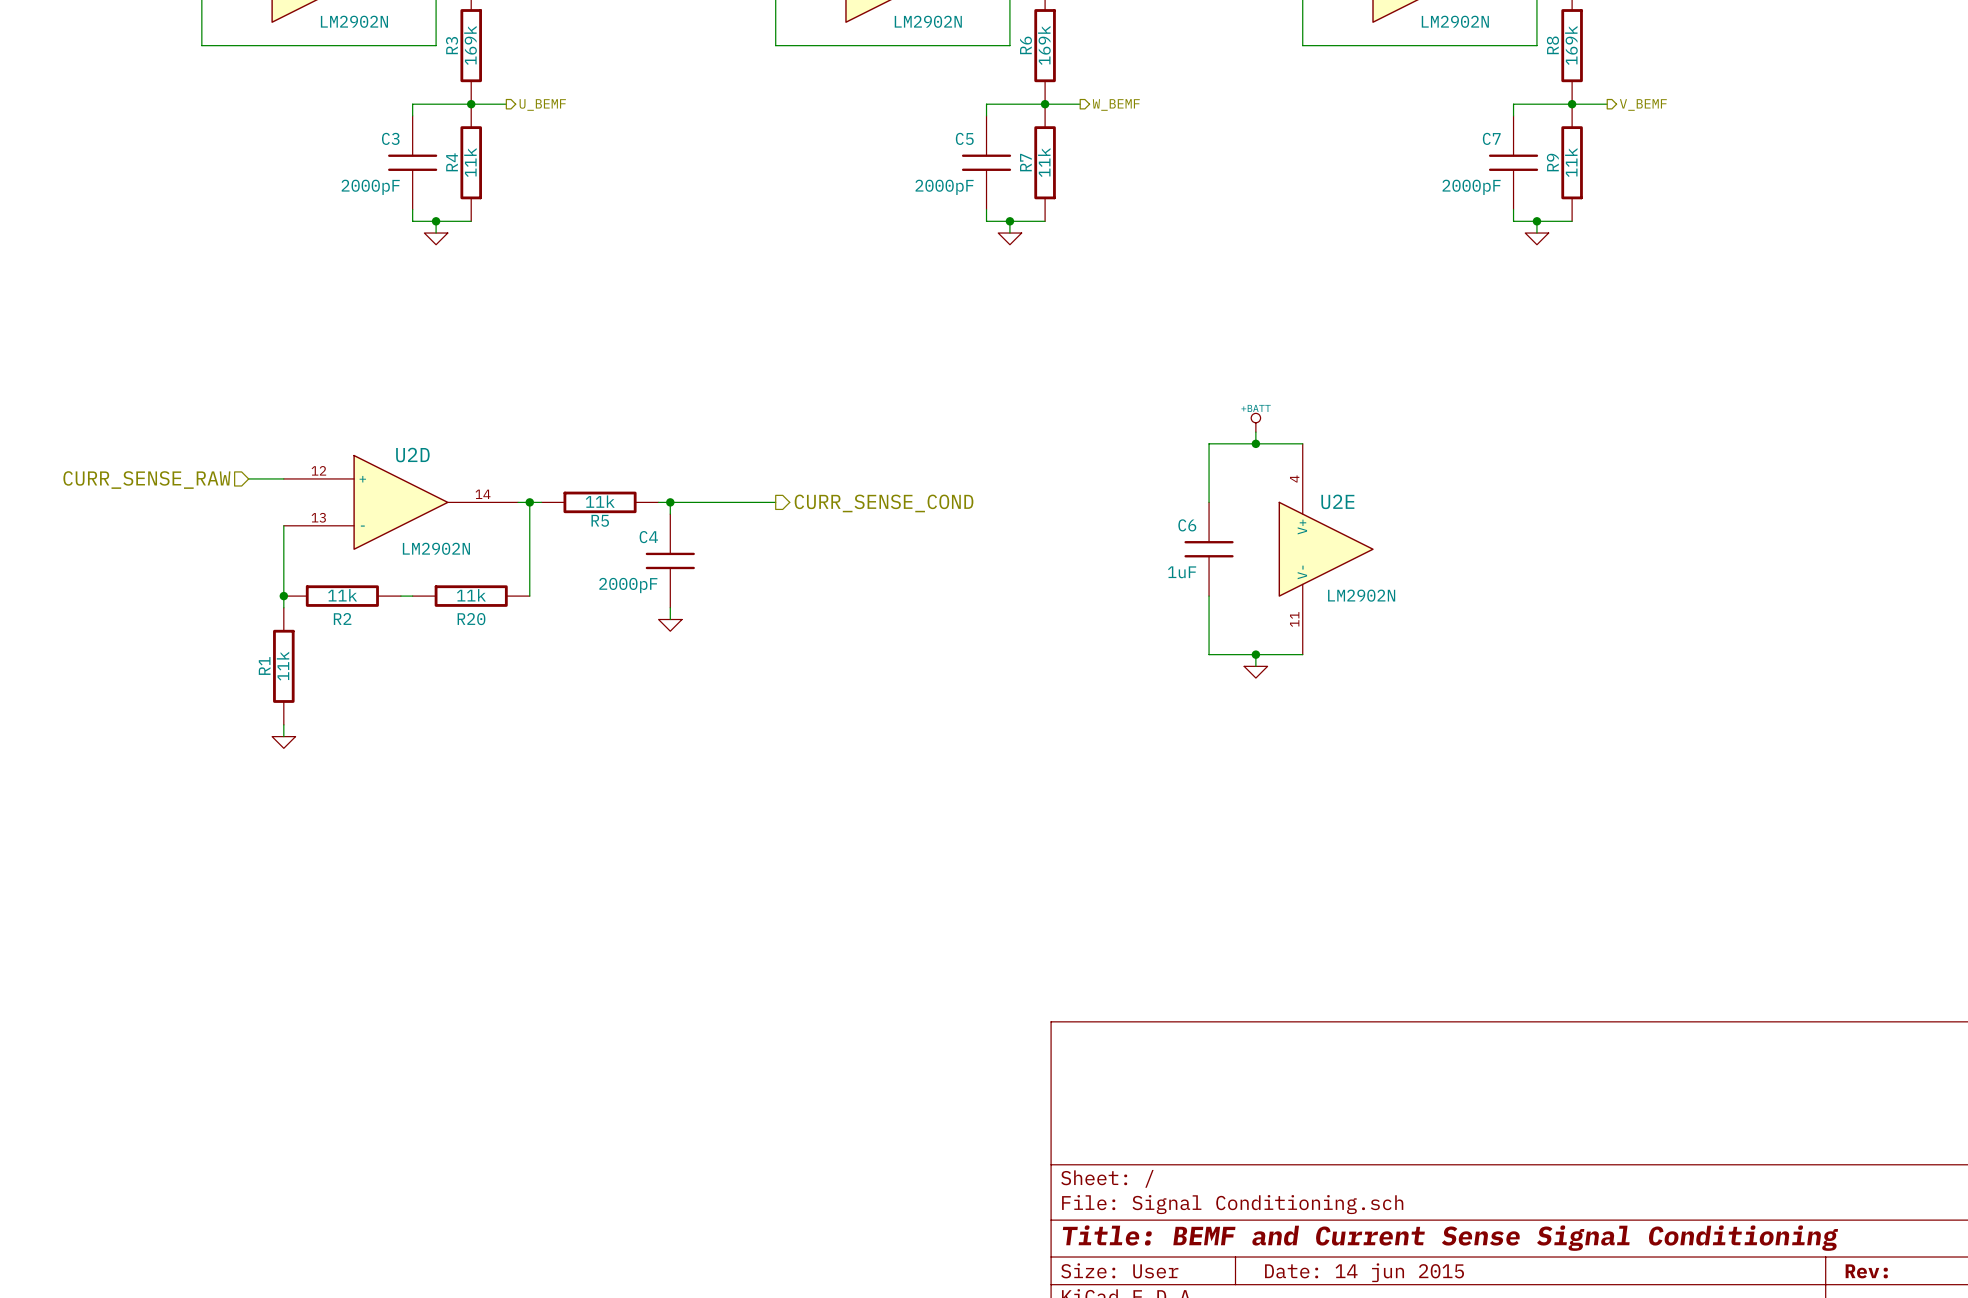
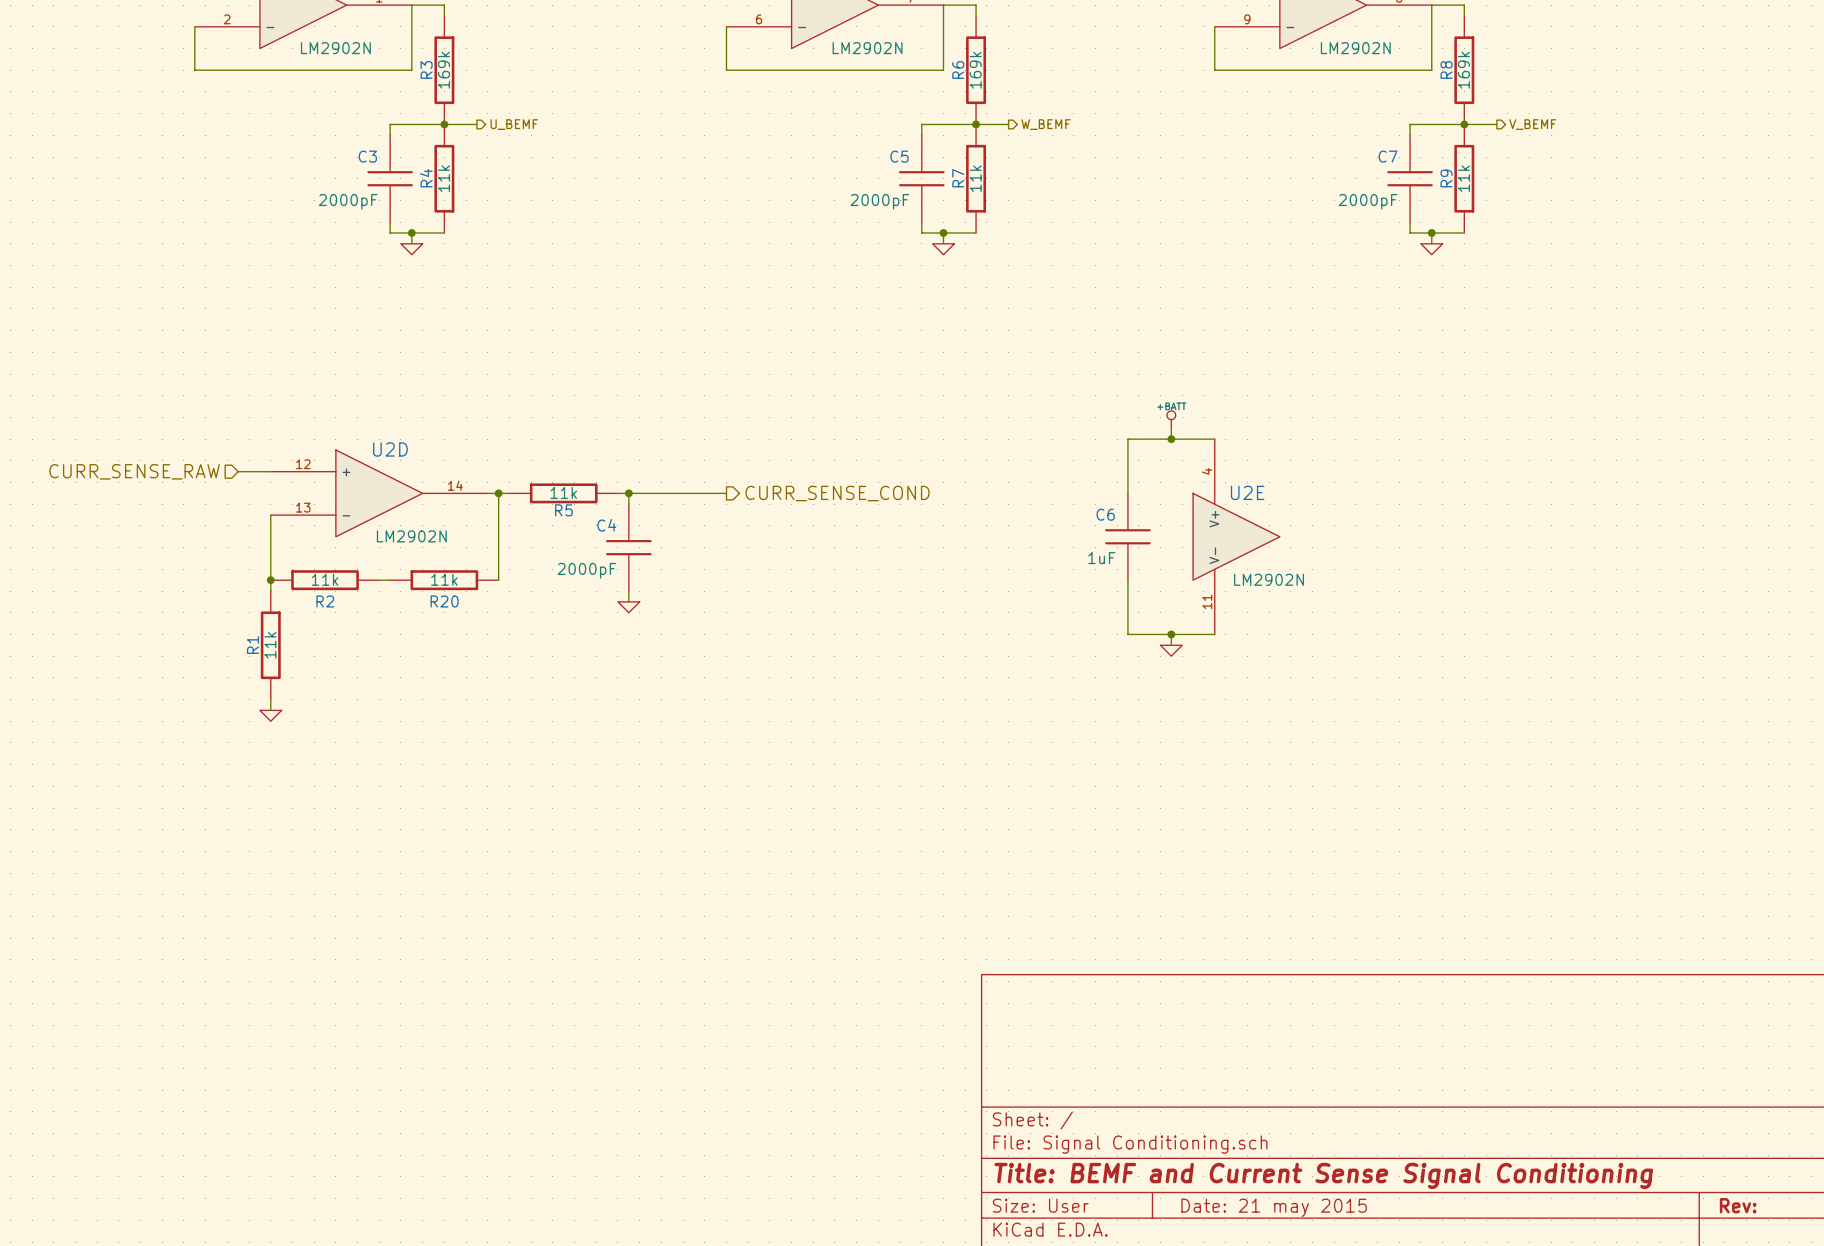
title block: Date: 14 jun 2015 (1364, 1272) -> Date: 21 may 2015 (1274, 1207)

